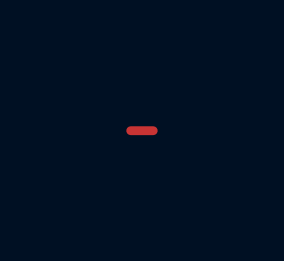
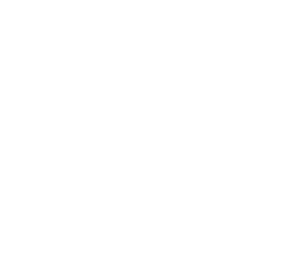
top track: (130, 130) (153, 130) -> none

